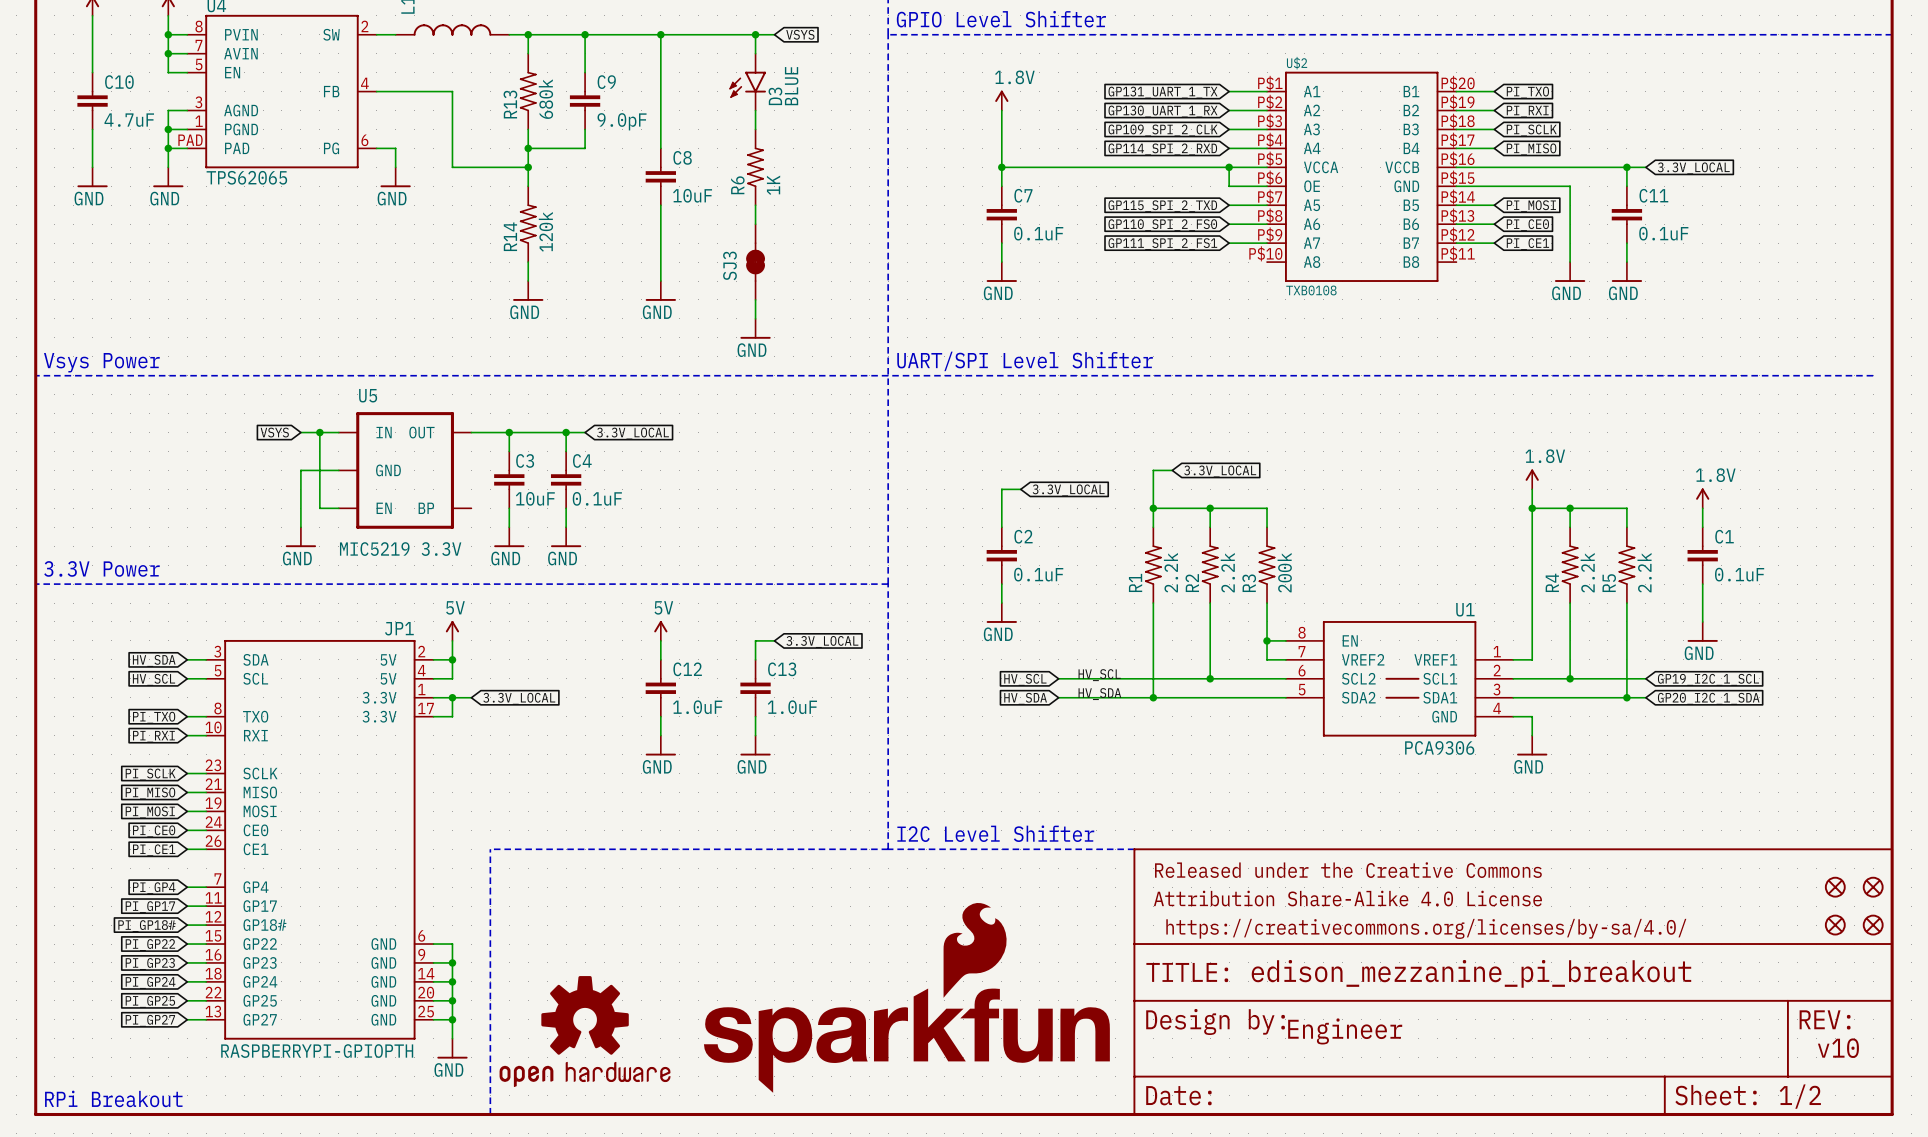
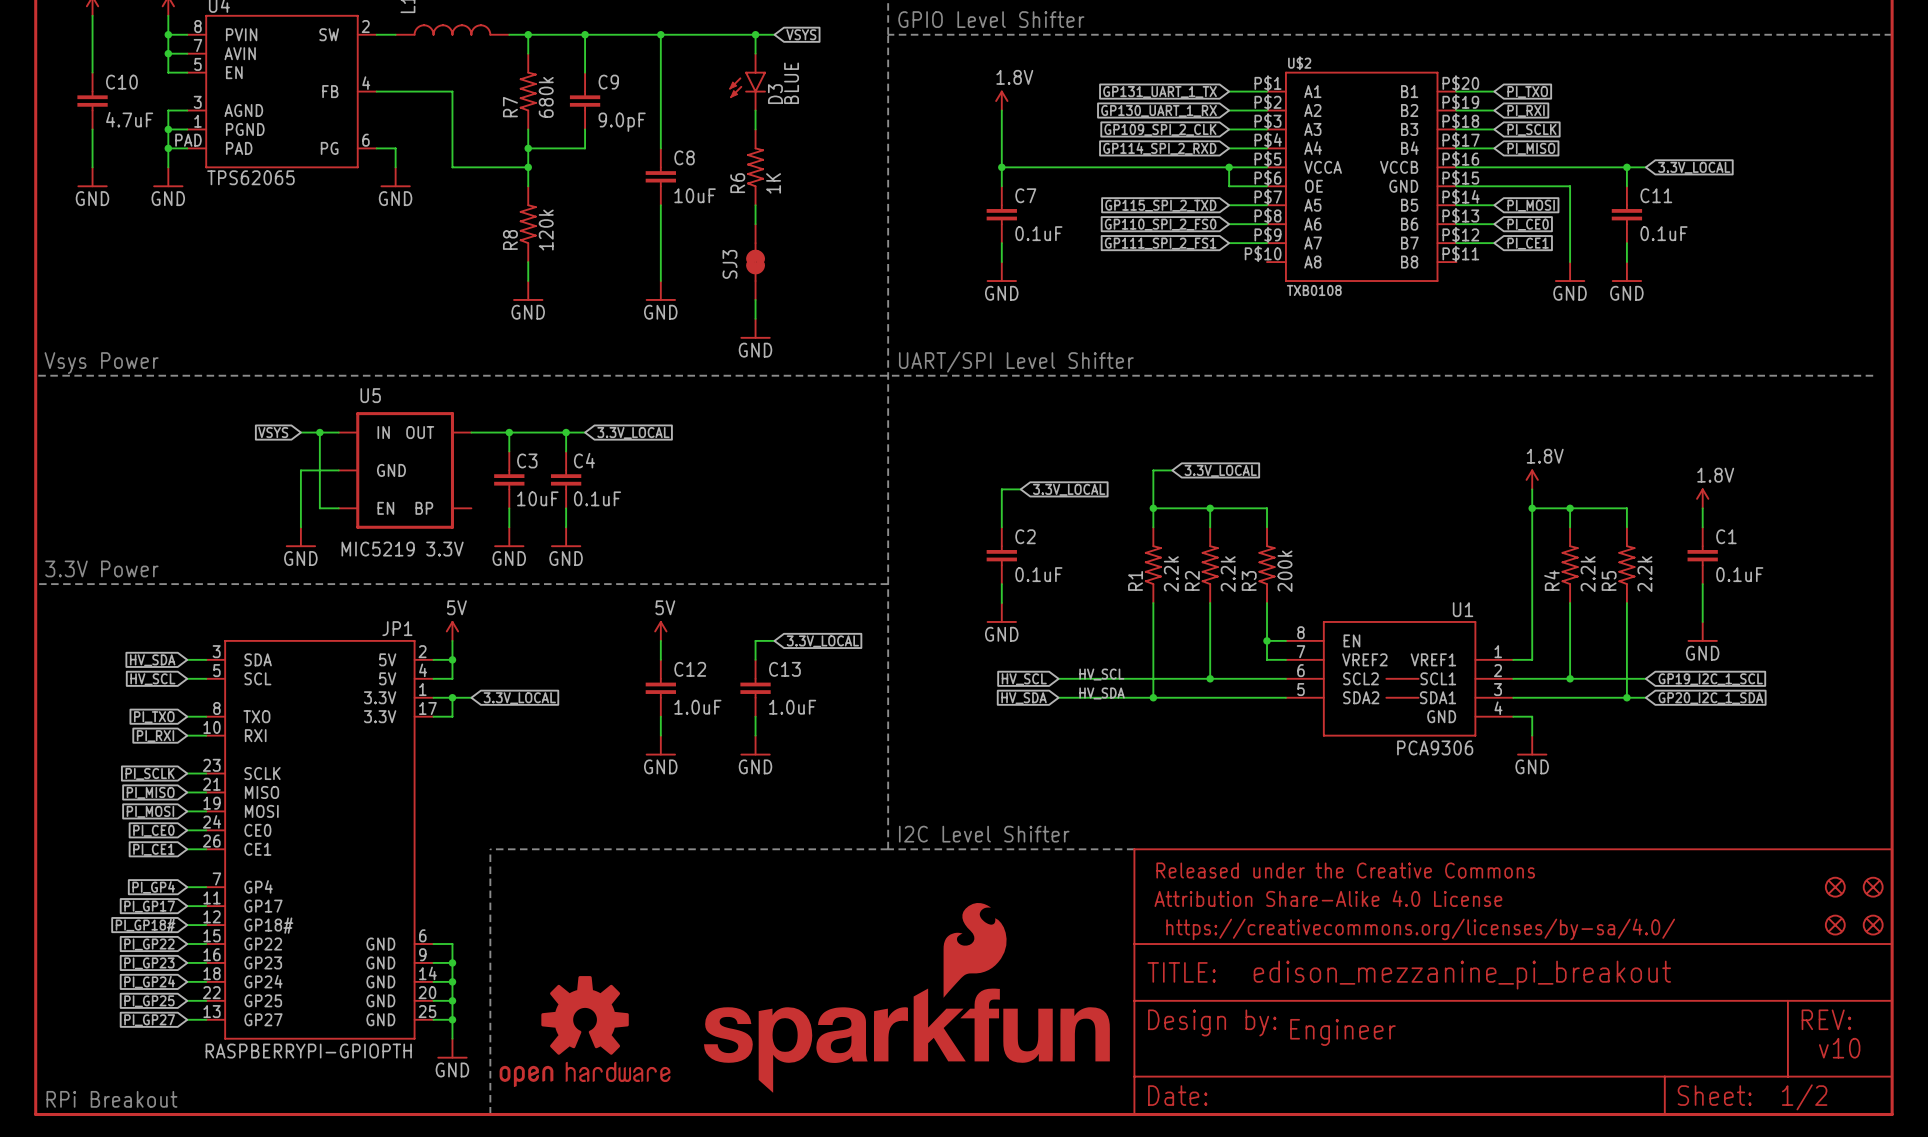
R13 name: R13 (510, 104) -> R7 (510, 107)
R14 name: R14 (510, 236) -> R8 (510, 239)

